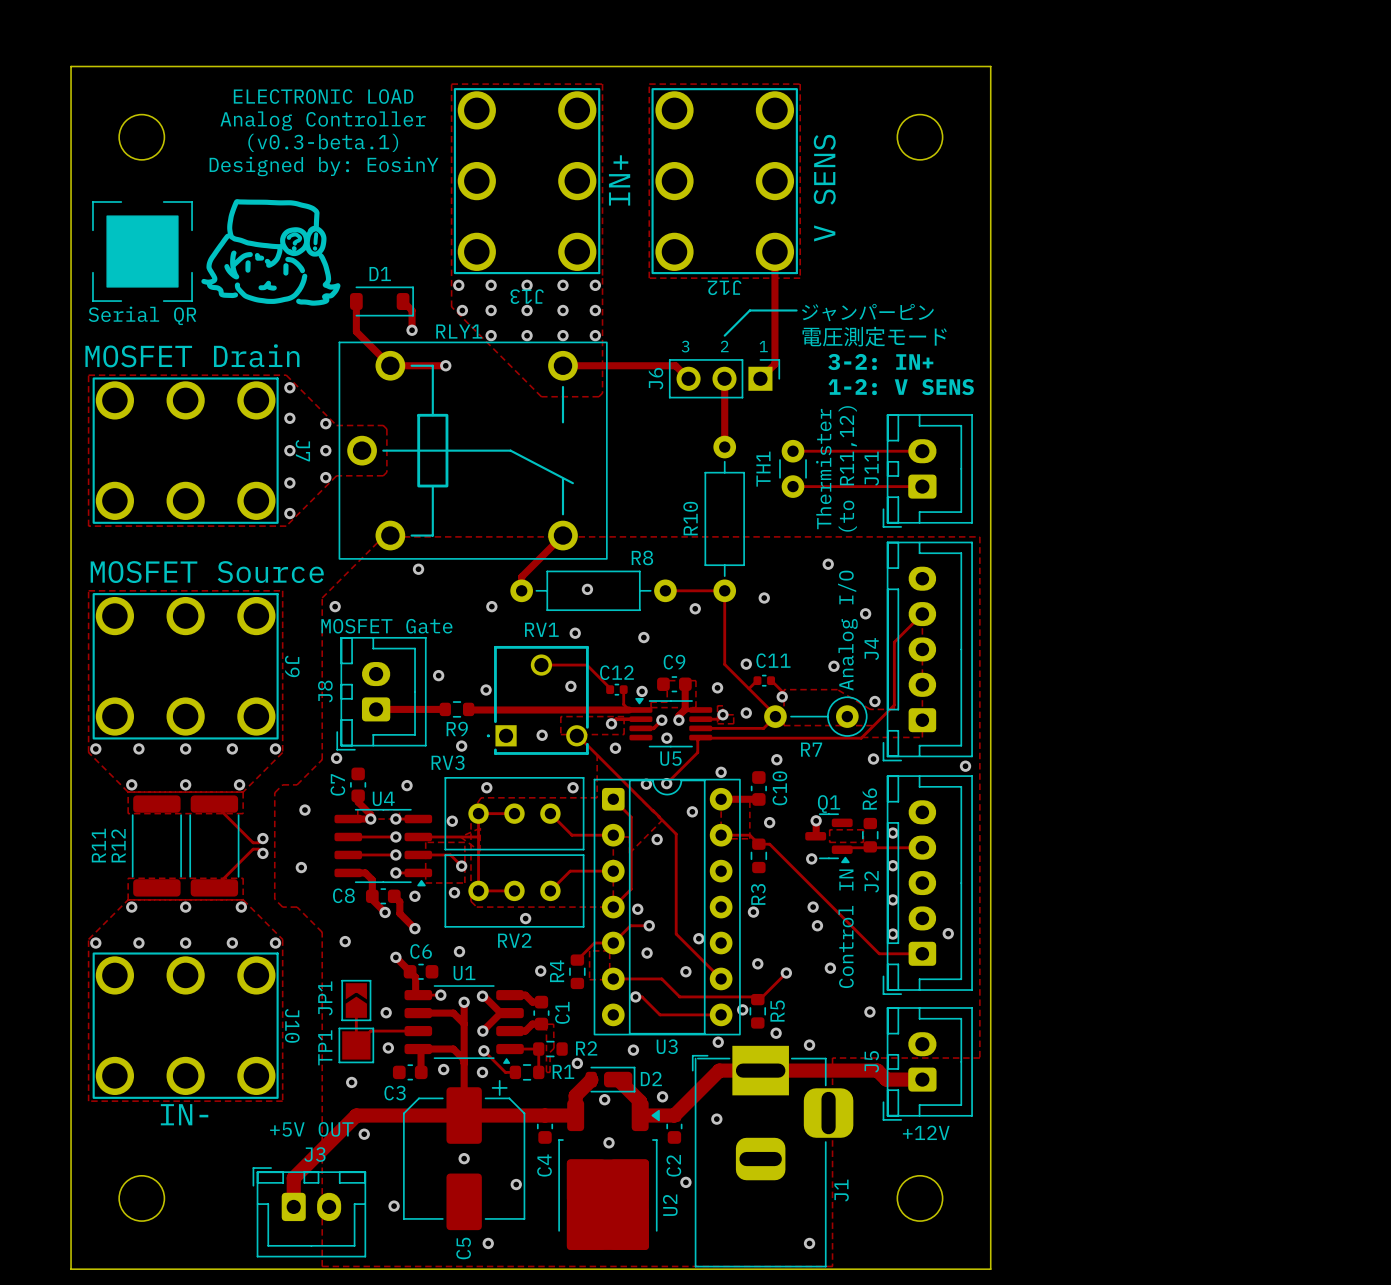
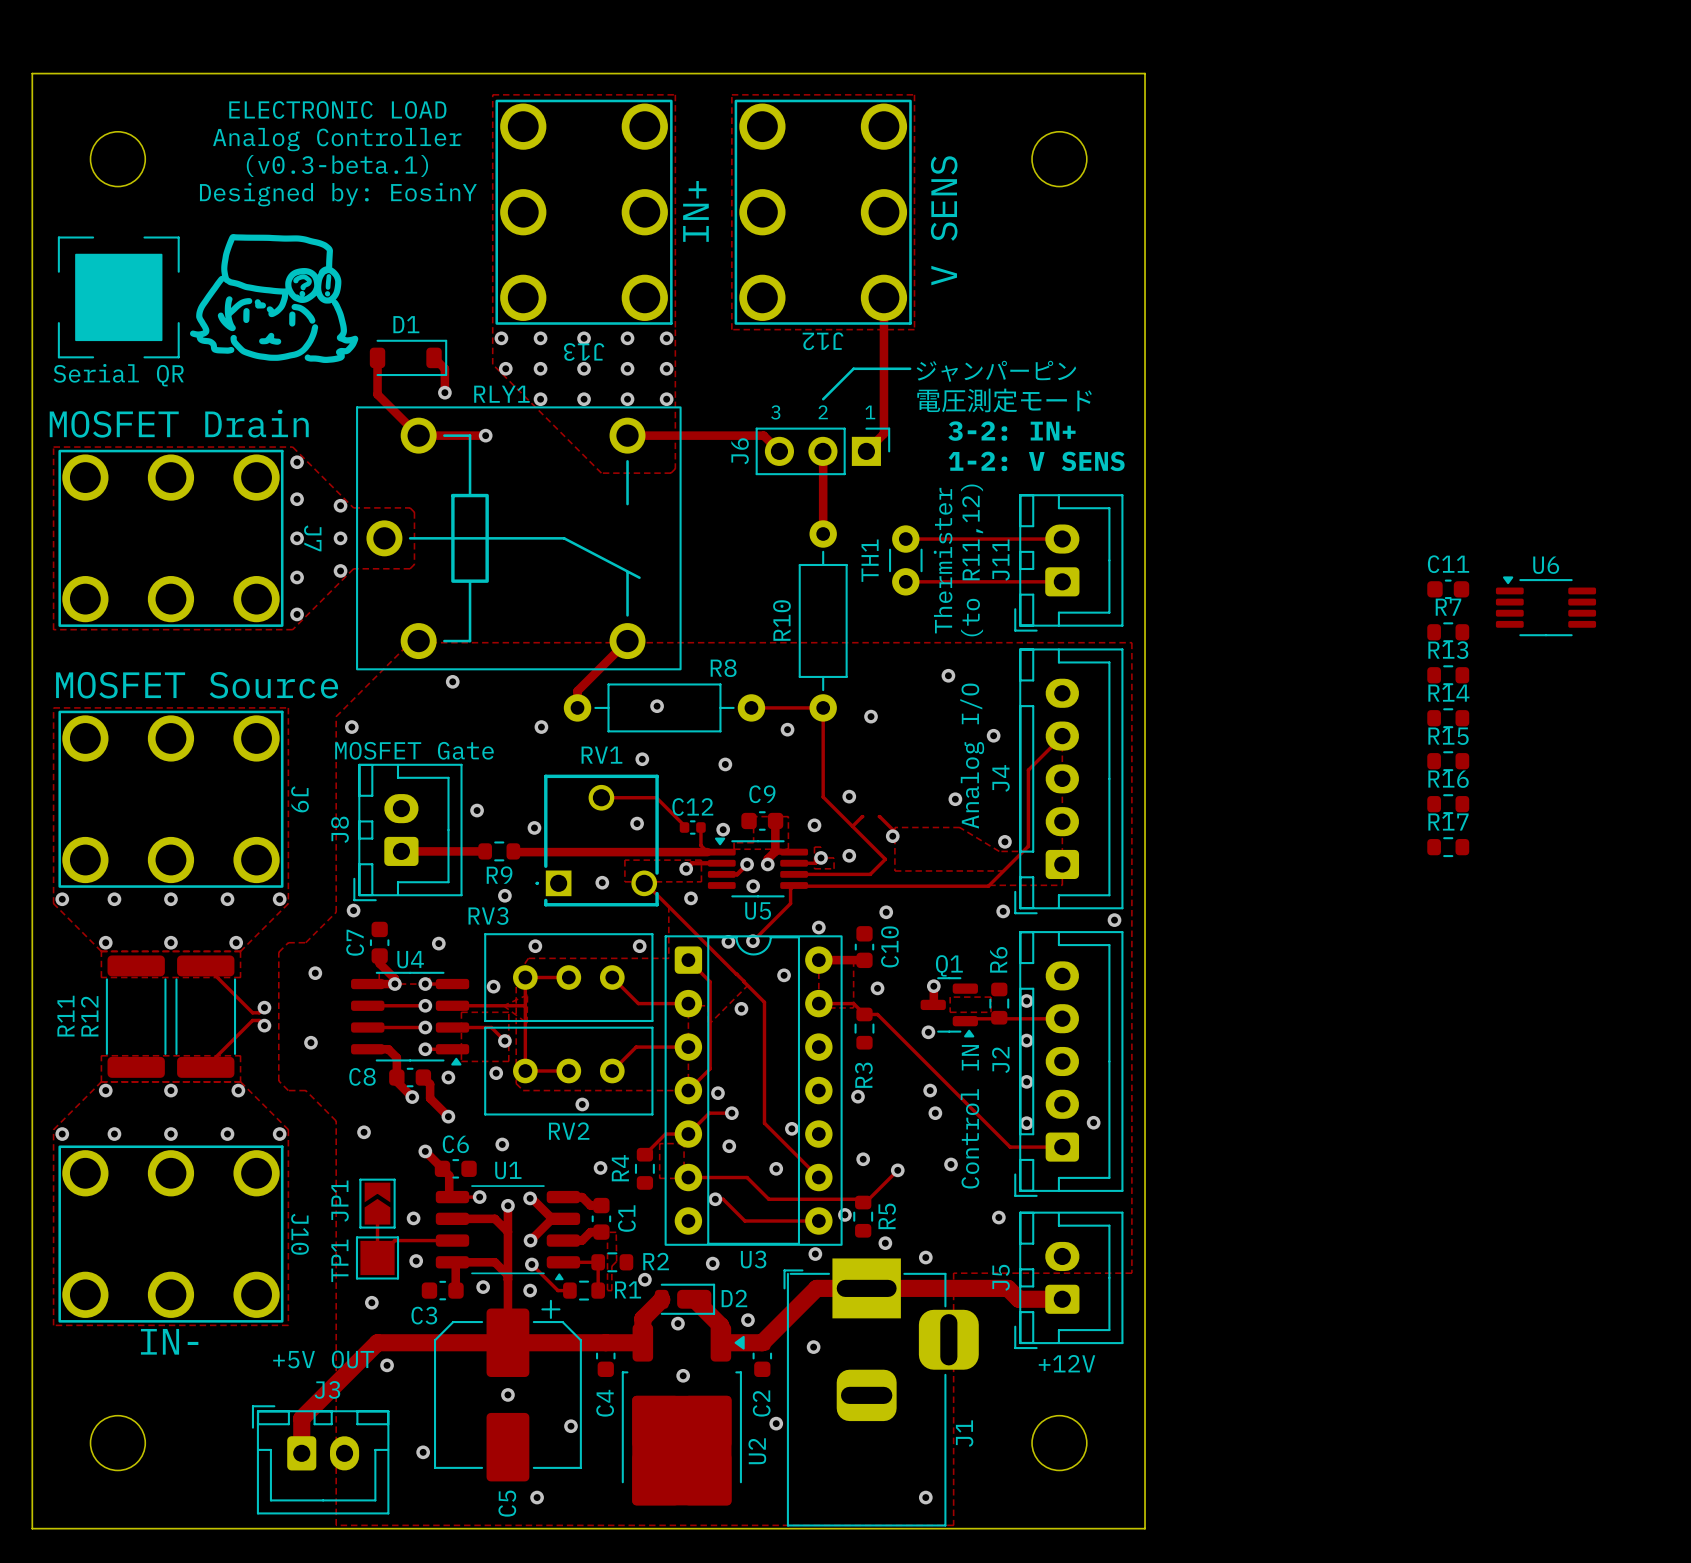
U6: none -> (1545, 606)
R13: none -> (1448, 675)
R14: none -> (1448, 718)
R15: none -> (1448, 761)
R16: none -> (1448, 804)
C11 footprint: [753, 674, 776, 687] -> [1427, 579, 1470, 600]
R7 footprint: [764, 696, 868, 737] -> [1427, 622, 1470, 643]
R17: none -> (1448, 847)
R7 name position: R7 (811, 749) -> R7 (1448, 607)

